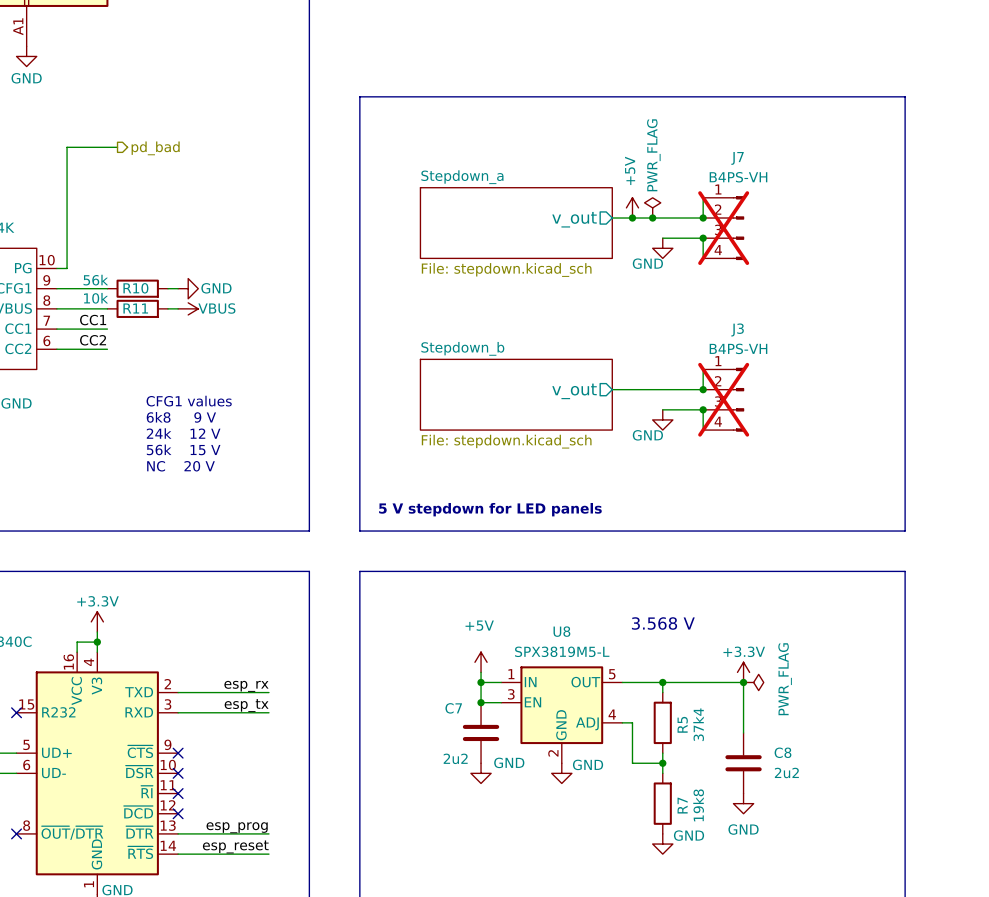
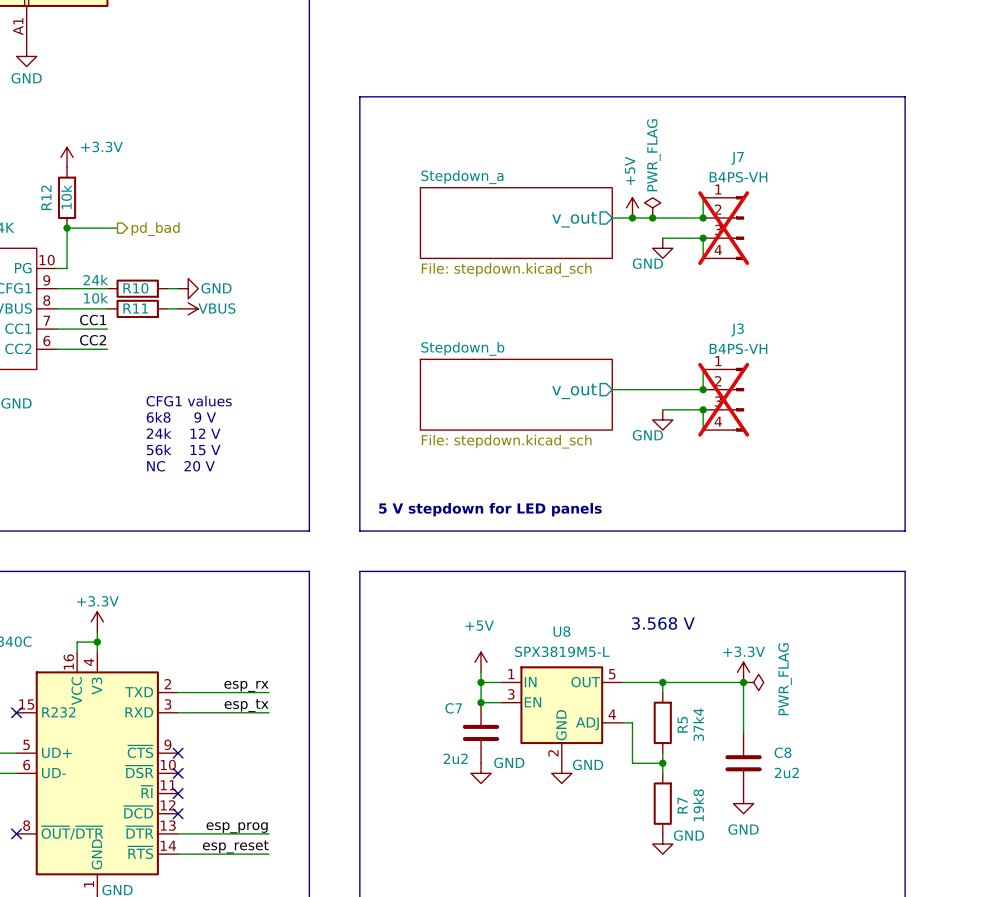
wire: (117, 147) (67, 147) (67, 228) -> (117, 228) (67, 228)
hierarchical label position: pd_bad (155, 148) -> pd_bad (155, 229)
power symbol: none -> +3.3V (67, 157)
R12: none -> 10k (67, 197)
junction: none -> (67, 228)
R10 value: 56k (95, 280) -> 24k (95, 280)

